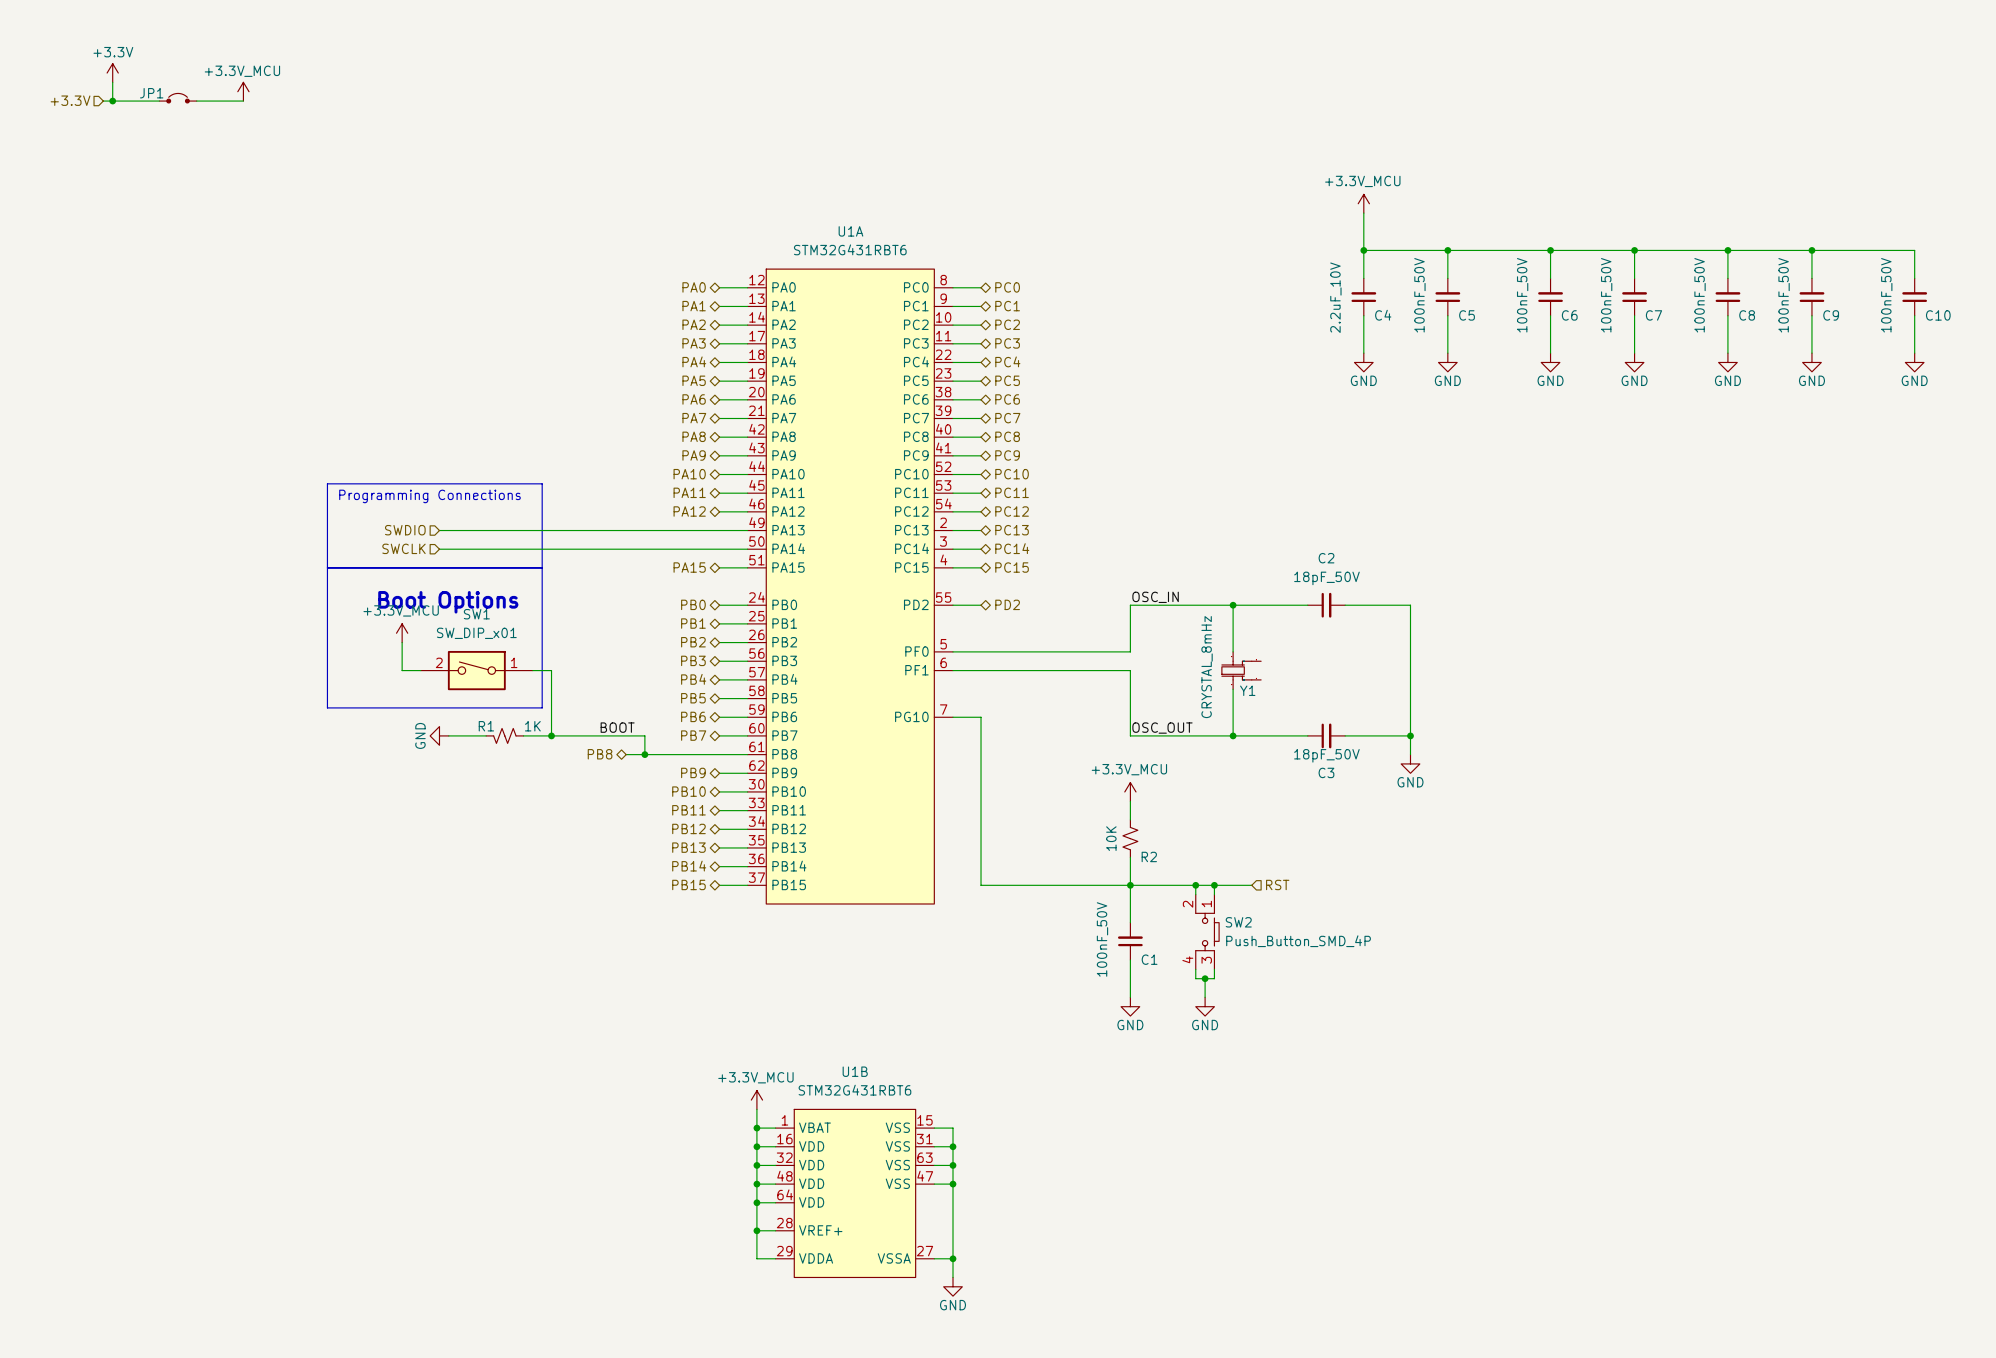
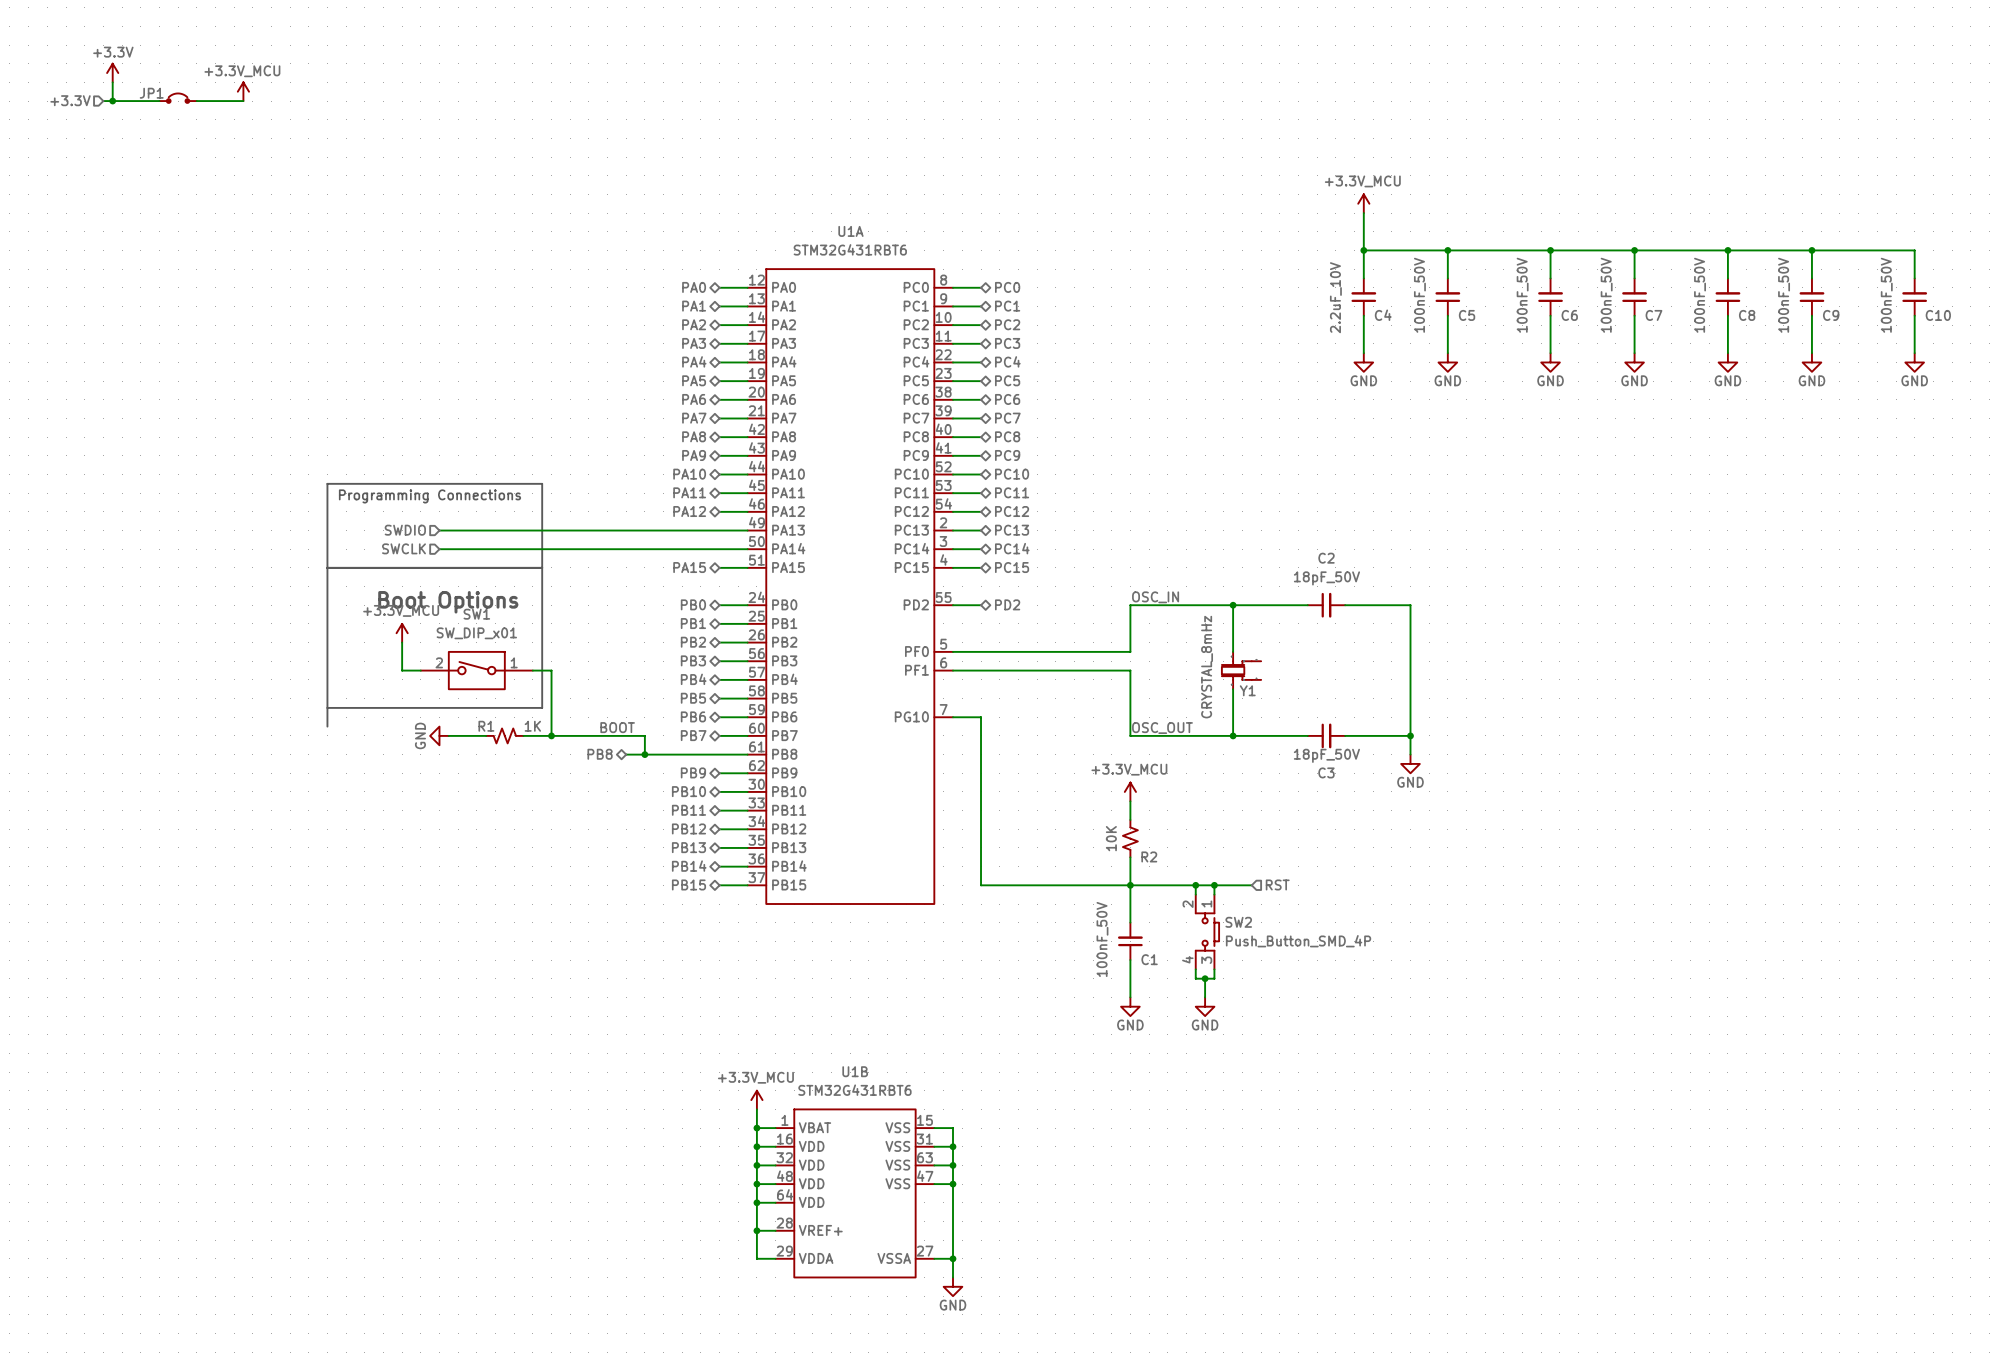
line: none -> (327, 707) (327, 726)

